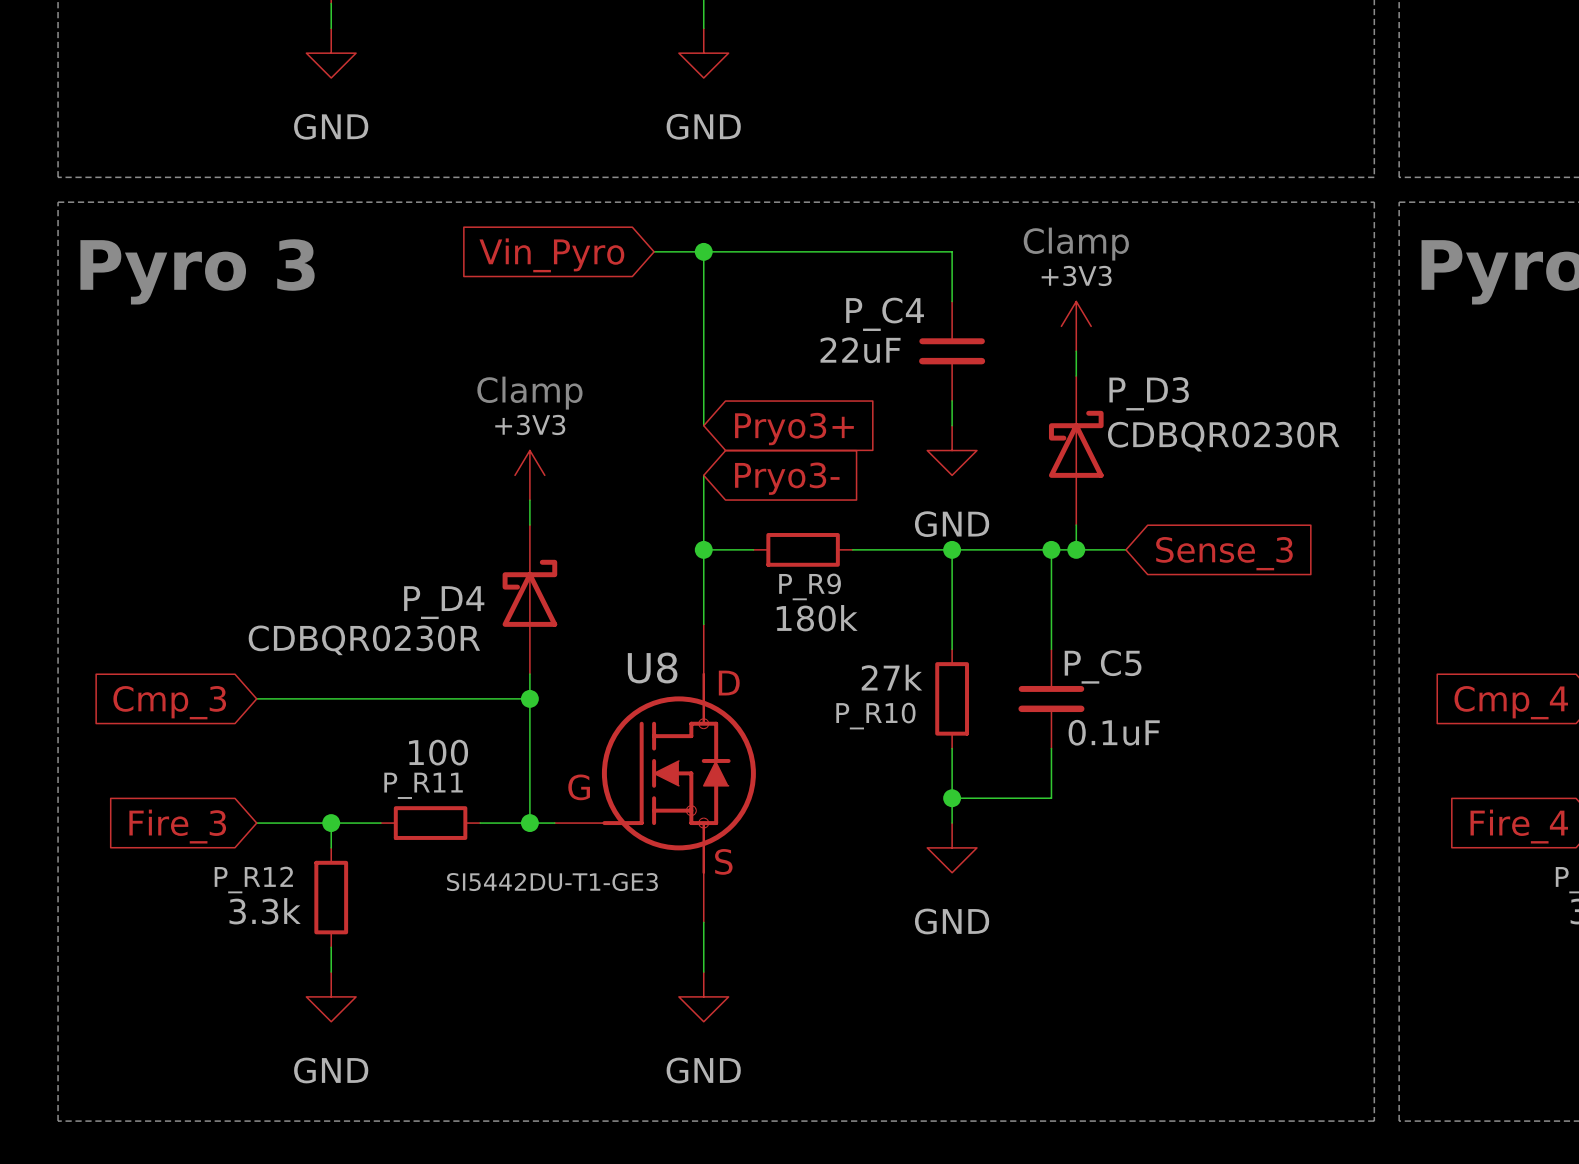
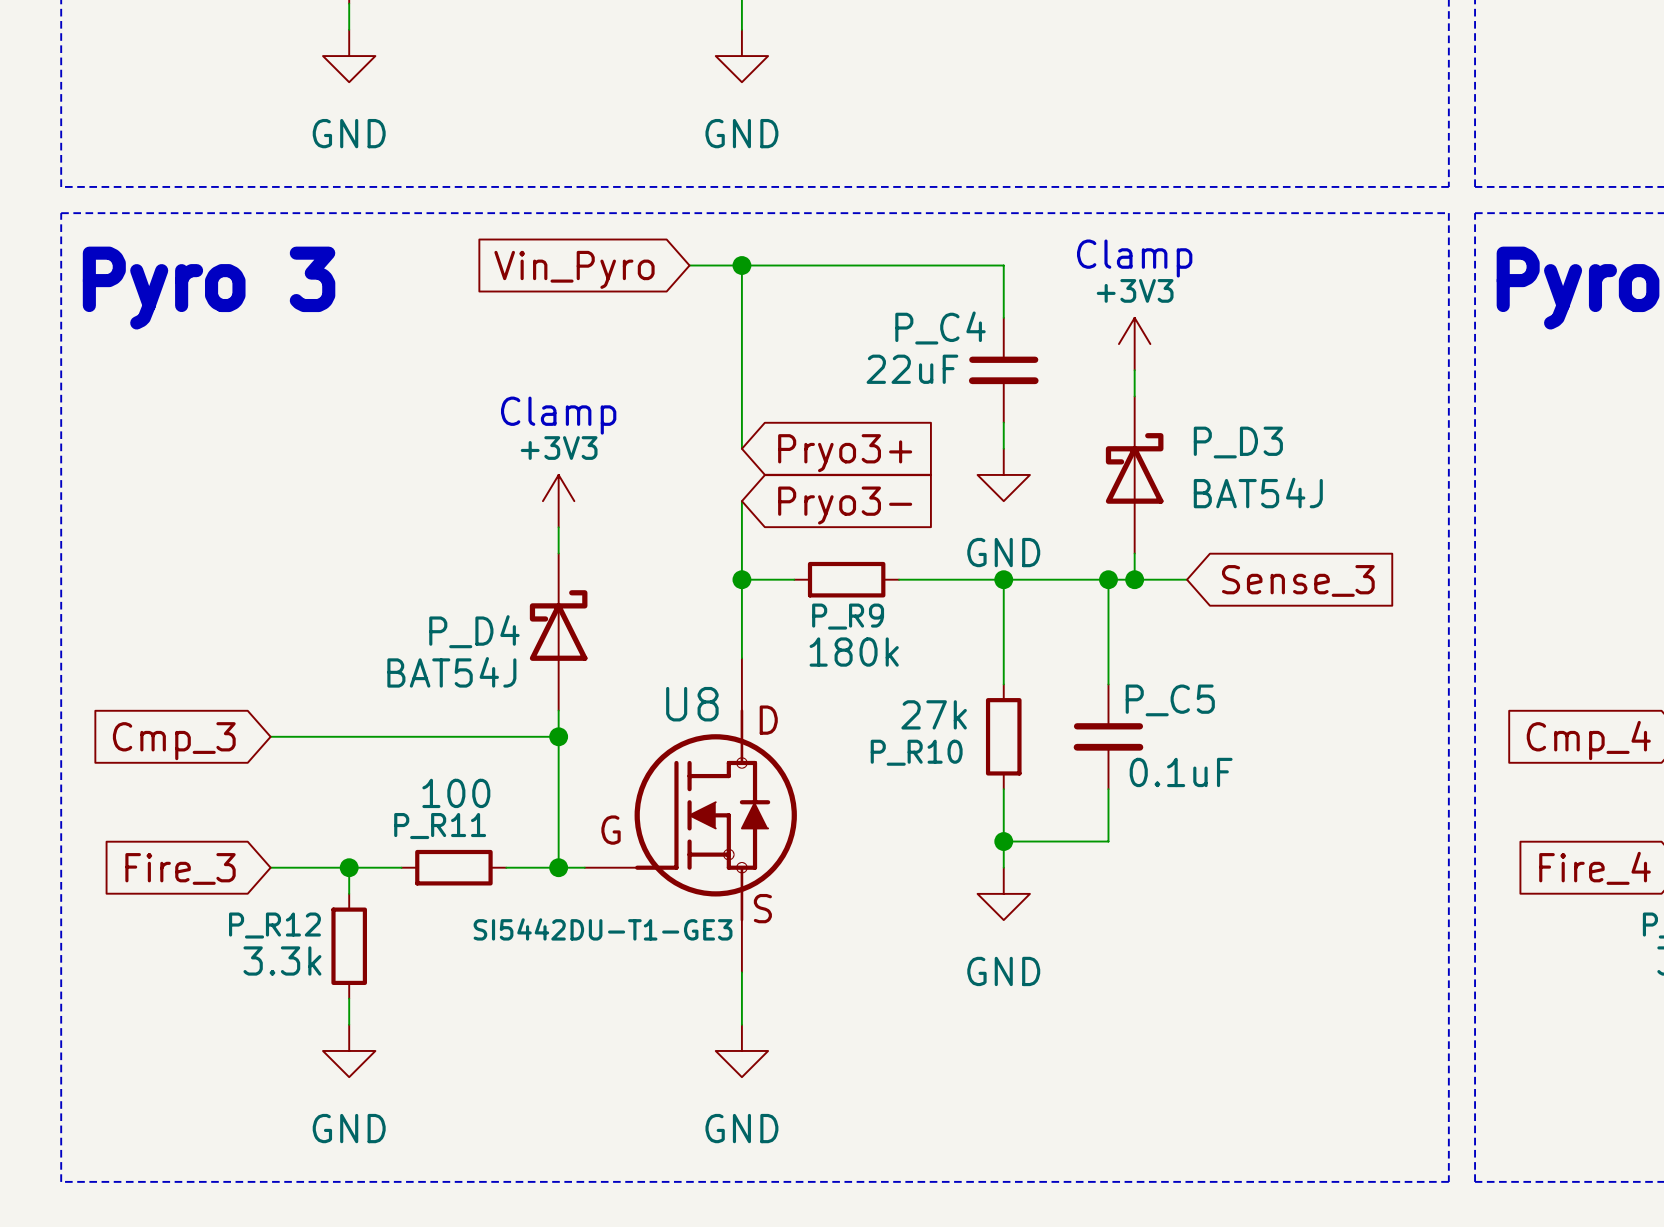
P_D3 name position: P_D3 (1149, 393) -> P_D3 (1238, 442)
P_D3 value: CDBQR0230R (1223, 436) -> BAT54J (1258, 493)
P_D4 value: CDBQR0230R (364, 640) -> BAT54J (451, 672)

